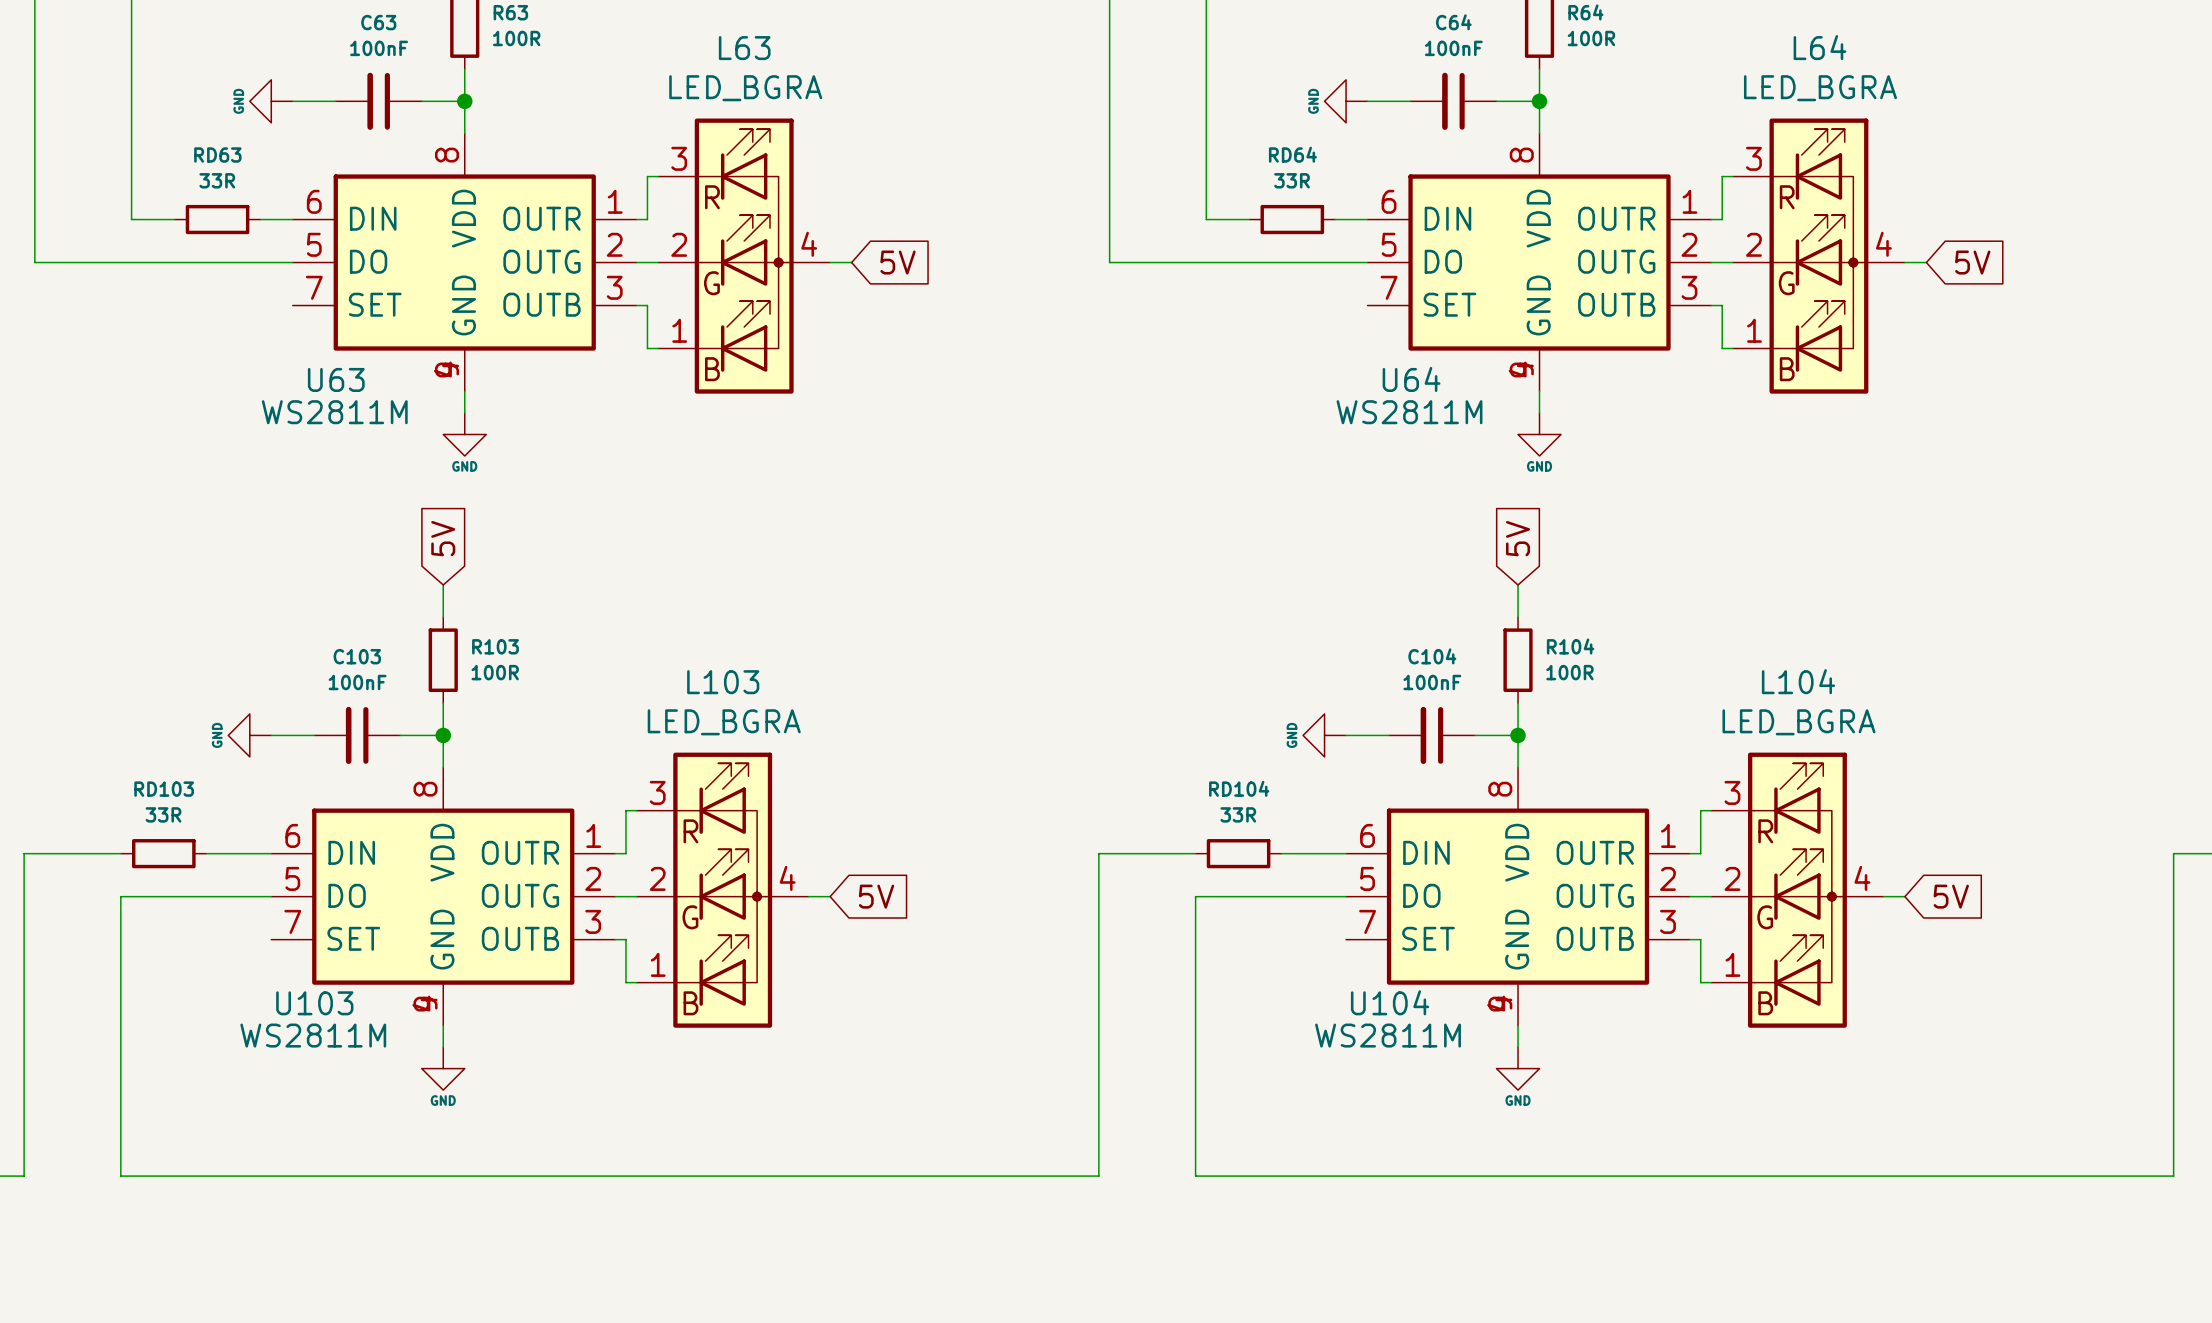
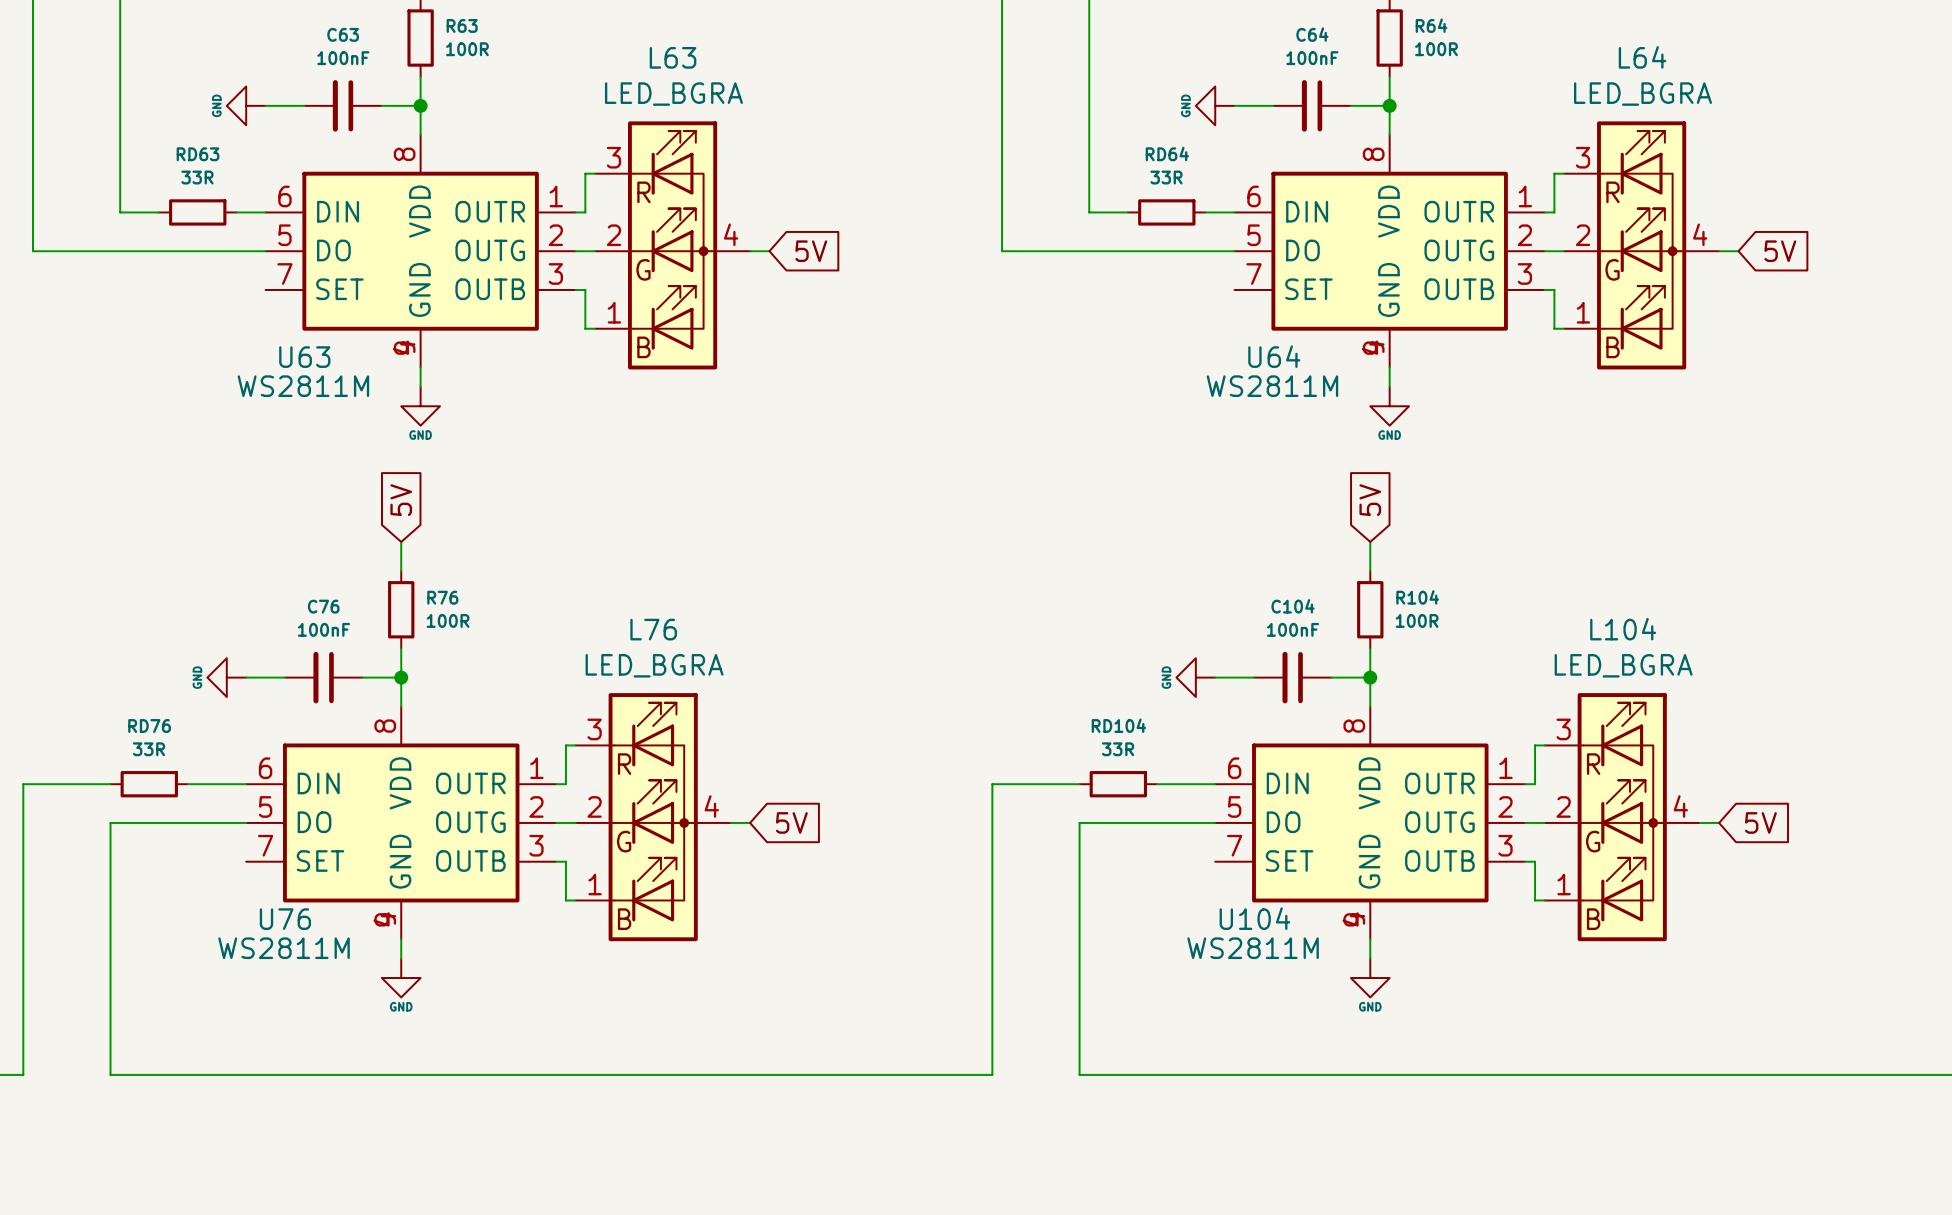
R103 name: R103 (495, 646) -> R76 (442, 597)
C103 name: C103 (357, 656) -> C76 (323, 606)
L103 name: L103 (723, 682) -> L76 (653, 629)
RD103 name: RD103 (164, 789) -> RD76 (149, 726)
U103 name: U103 (314, 1003) -> U76 (285, 919)

